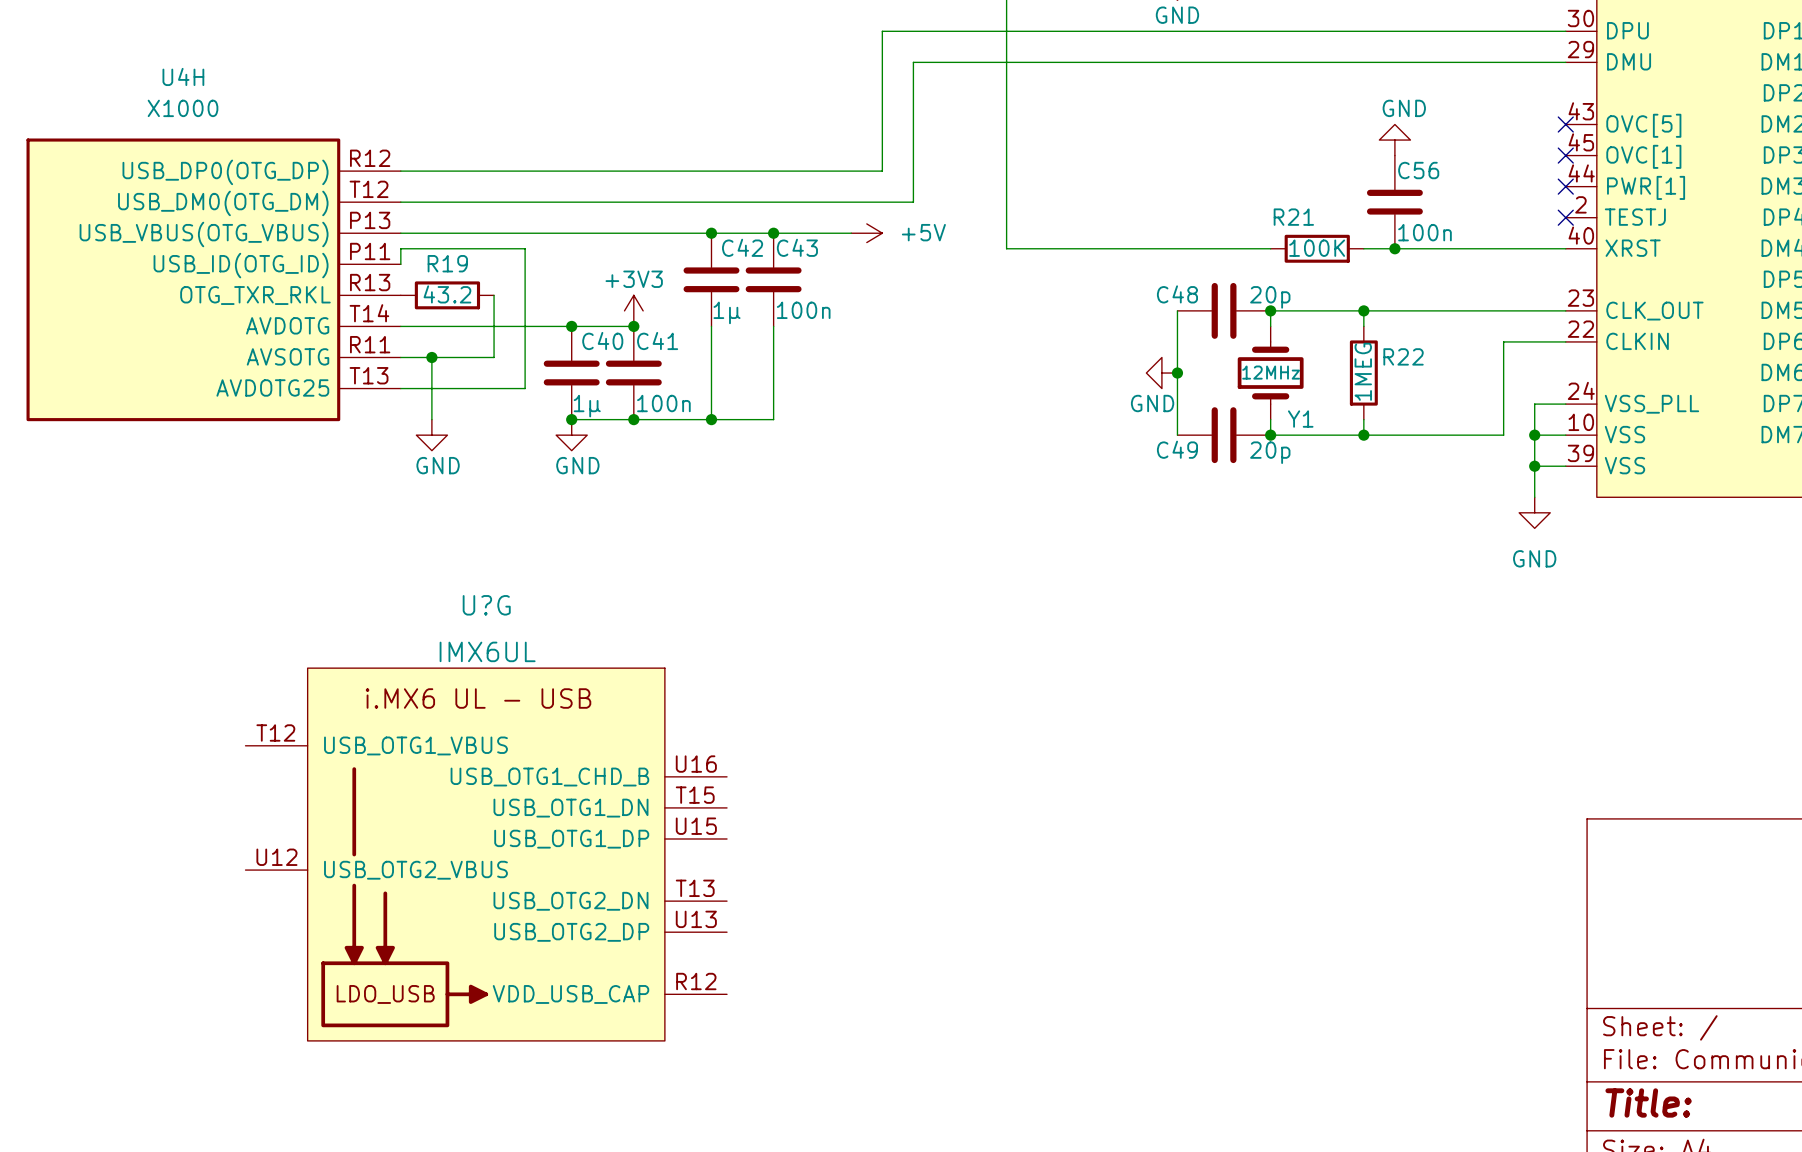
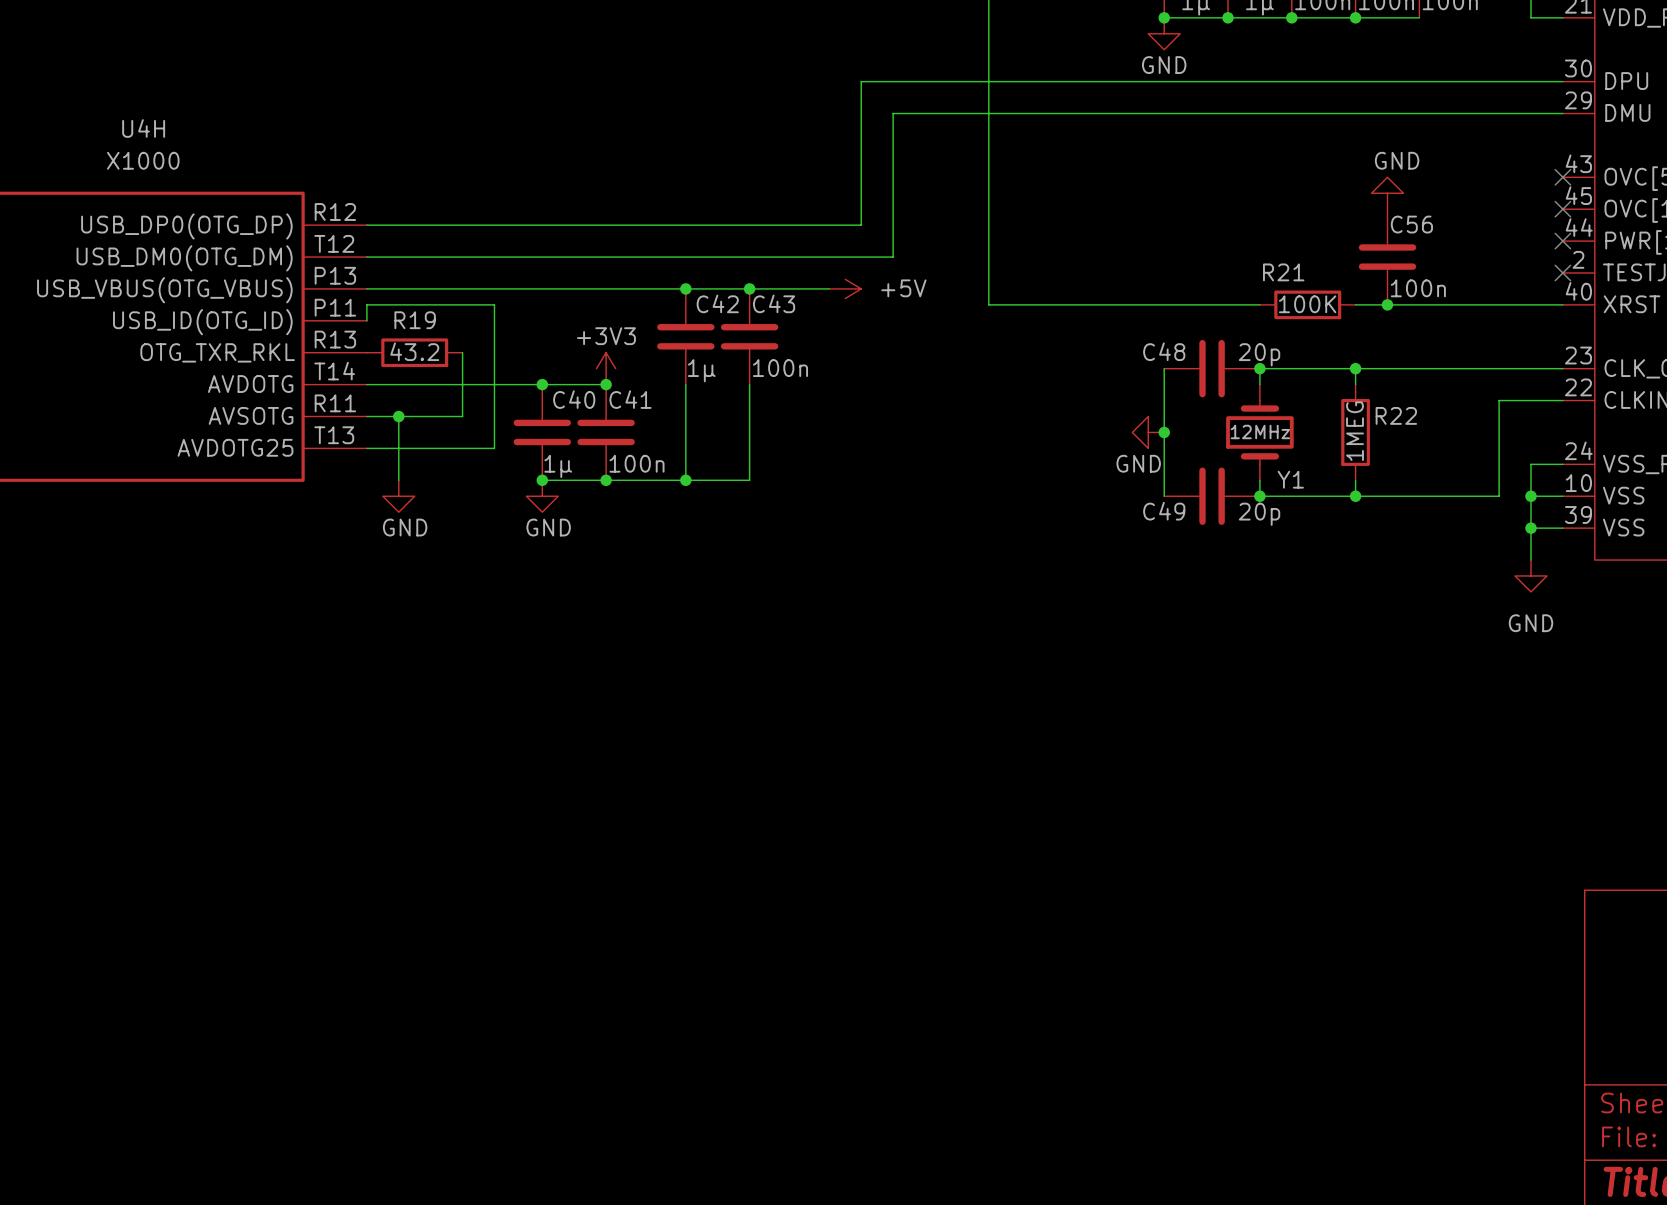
U?G: IMX6UL (486, 854) -> none

